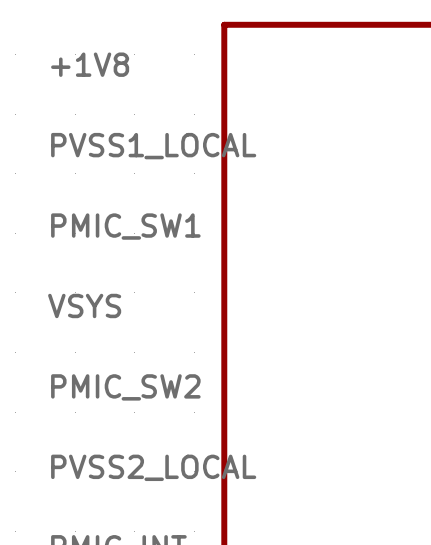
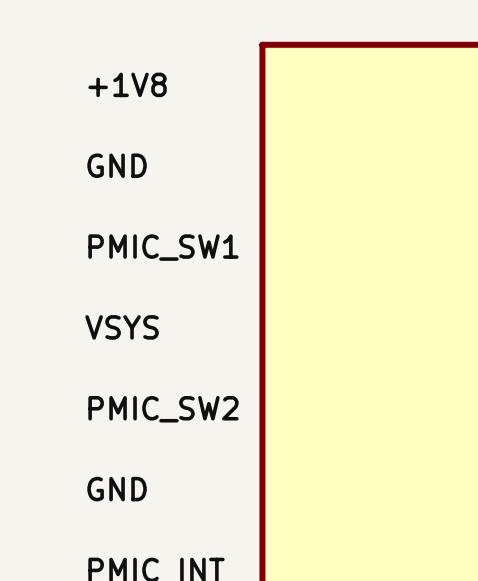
label: PVSS1_LOCAL (153, 146) -> GND (117, 165)
label: PVSS2_LOCAL (153, 467) -> GND (117, 489)

